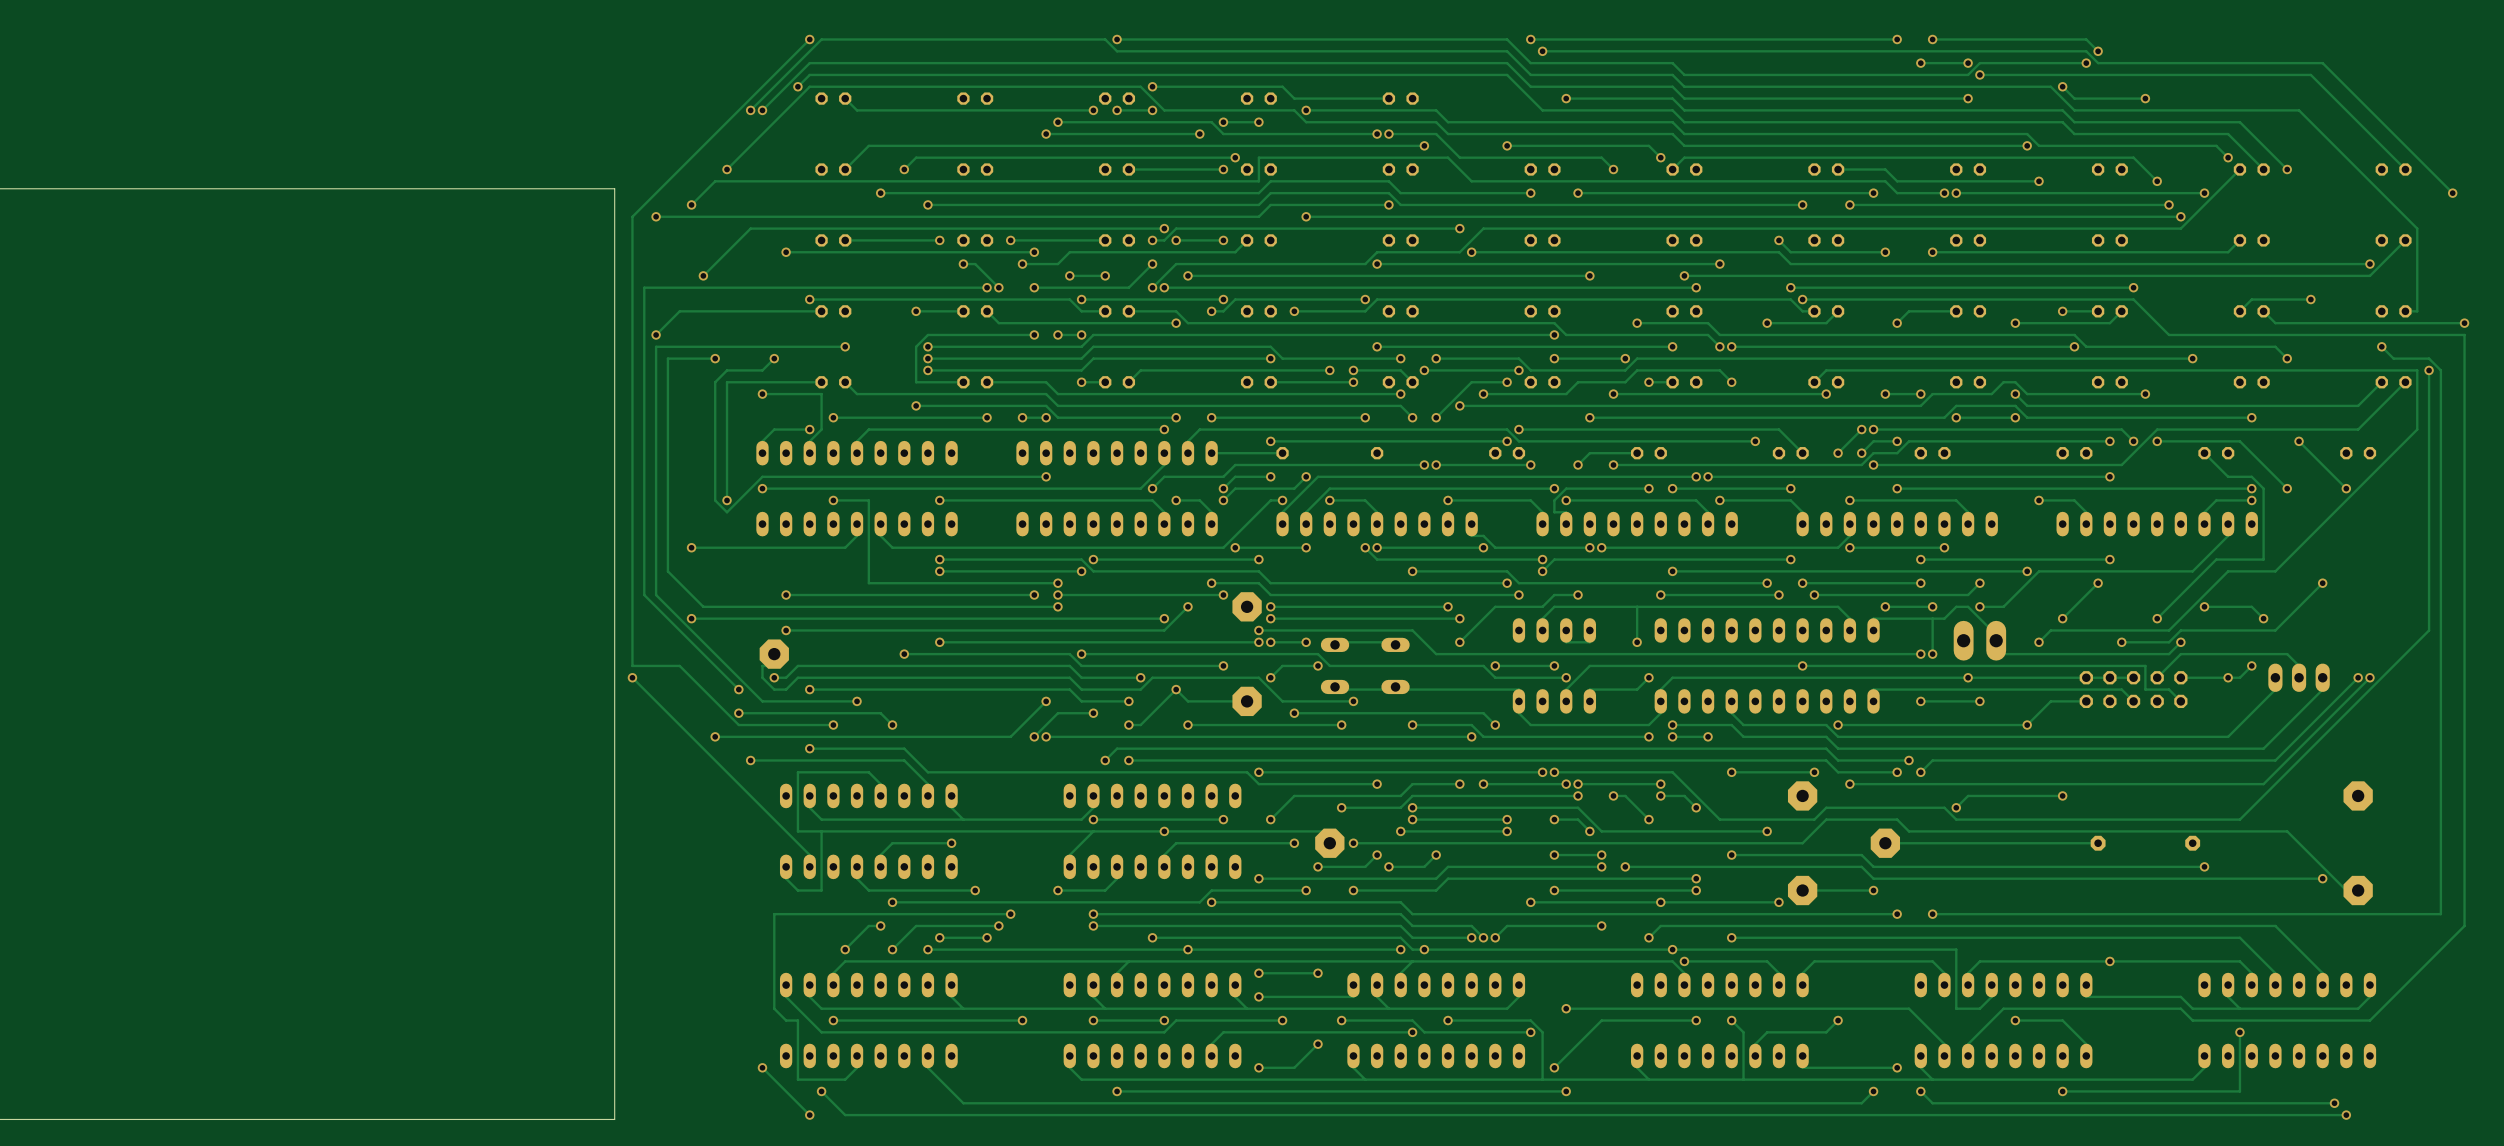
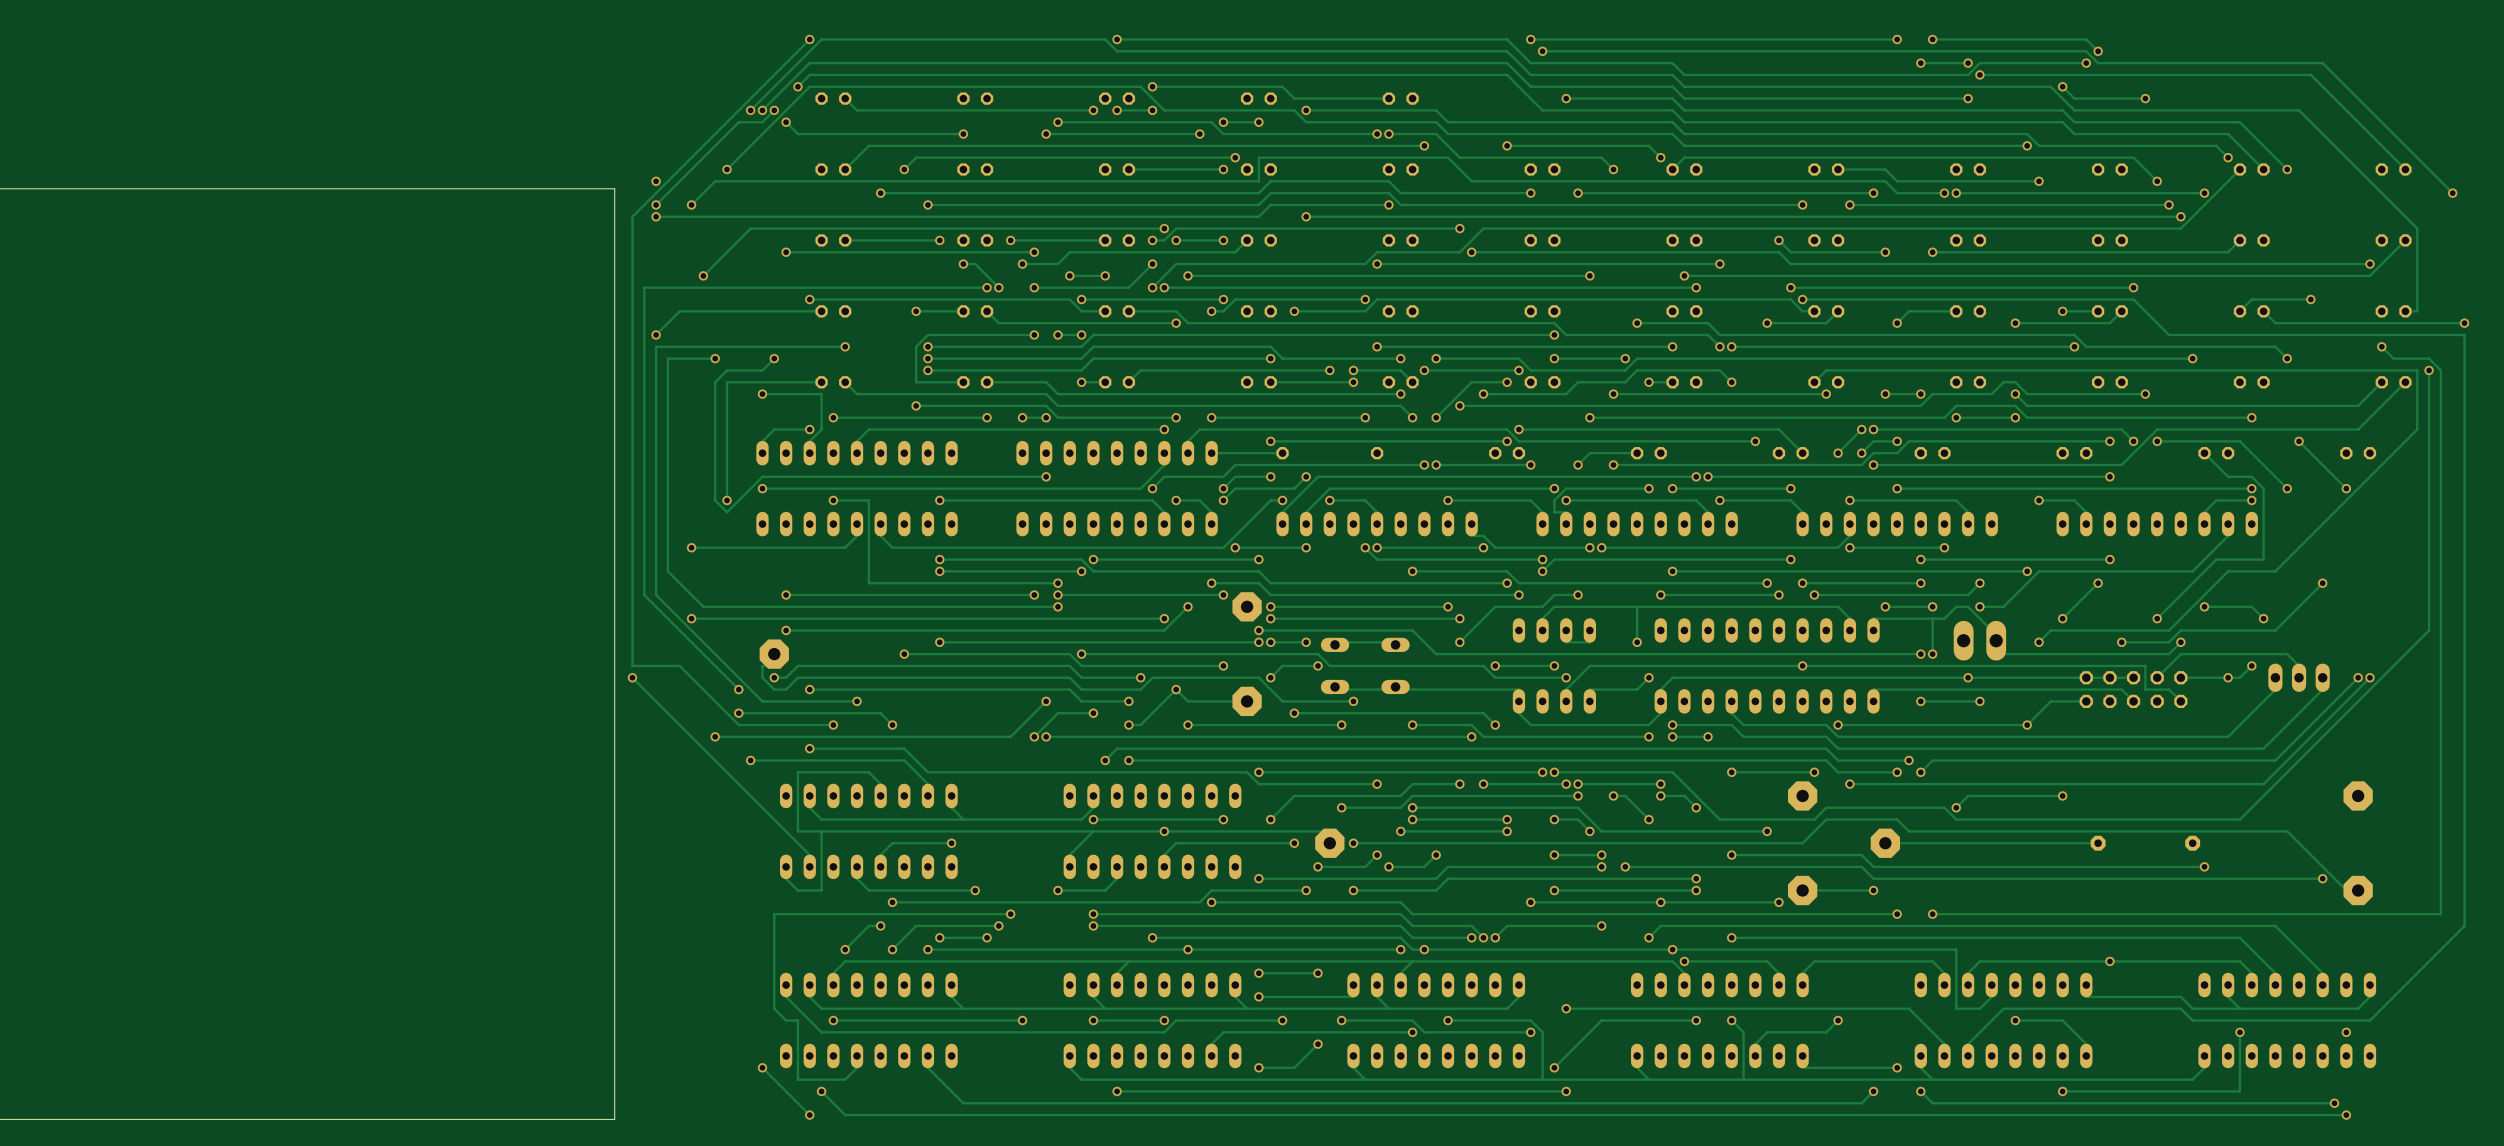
track: none -> (774, 110) (762, 122) (738, 122) (656, 204)
via: none -> (774, 110)
track: none -> (786, 122) (797, 134) (963, 134)
via: none -> (786, 122)
via: none -> (963, 134)
via: none -> (656, 181)
via: none -> (656, 204)
via: none -> (2346, 1032)

